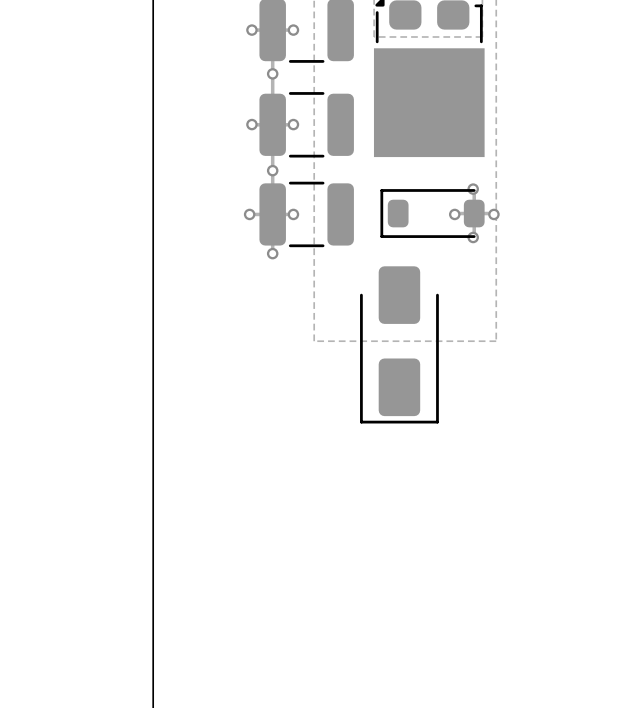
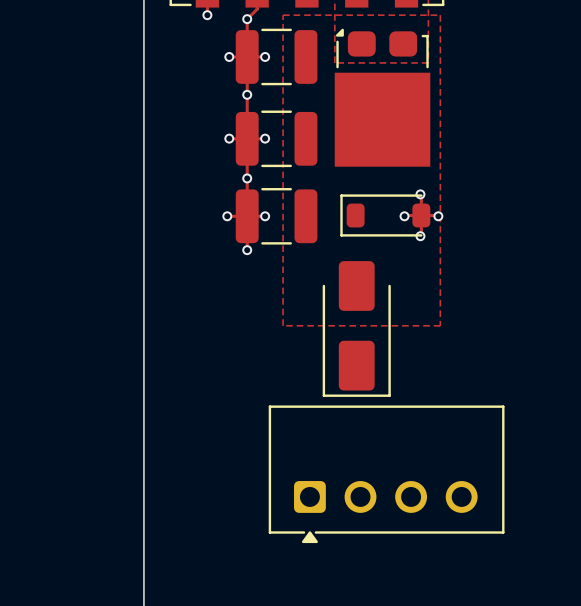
part: none -> (386, 474)

